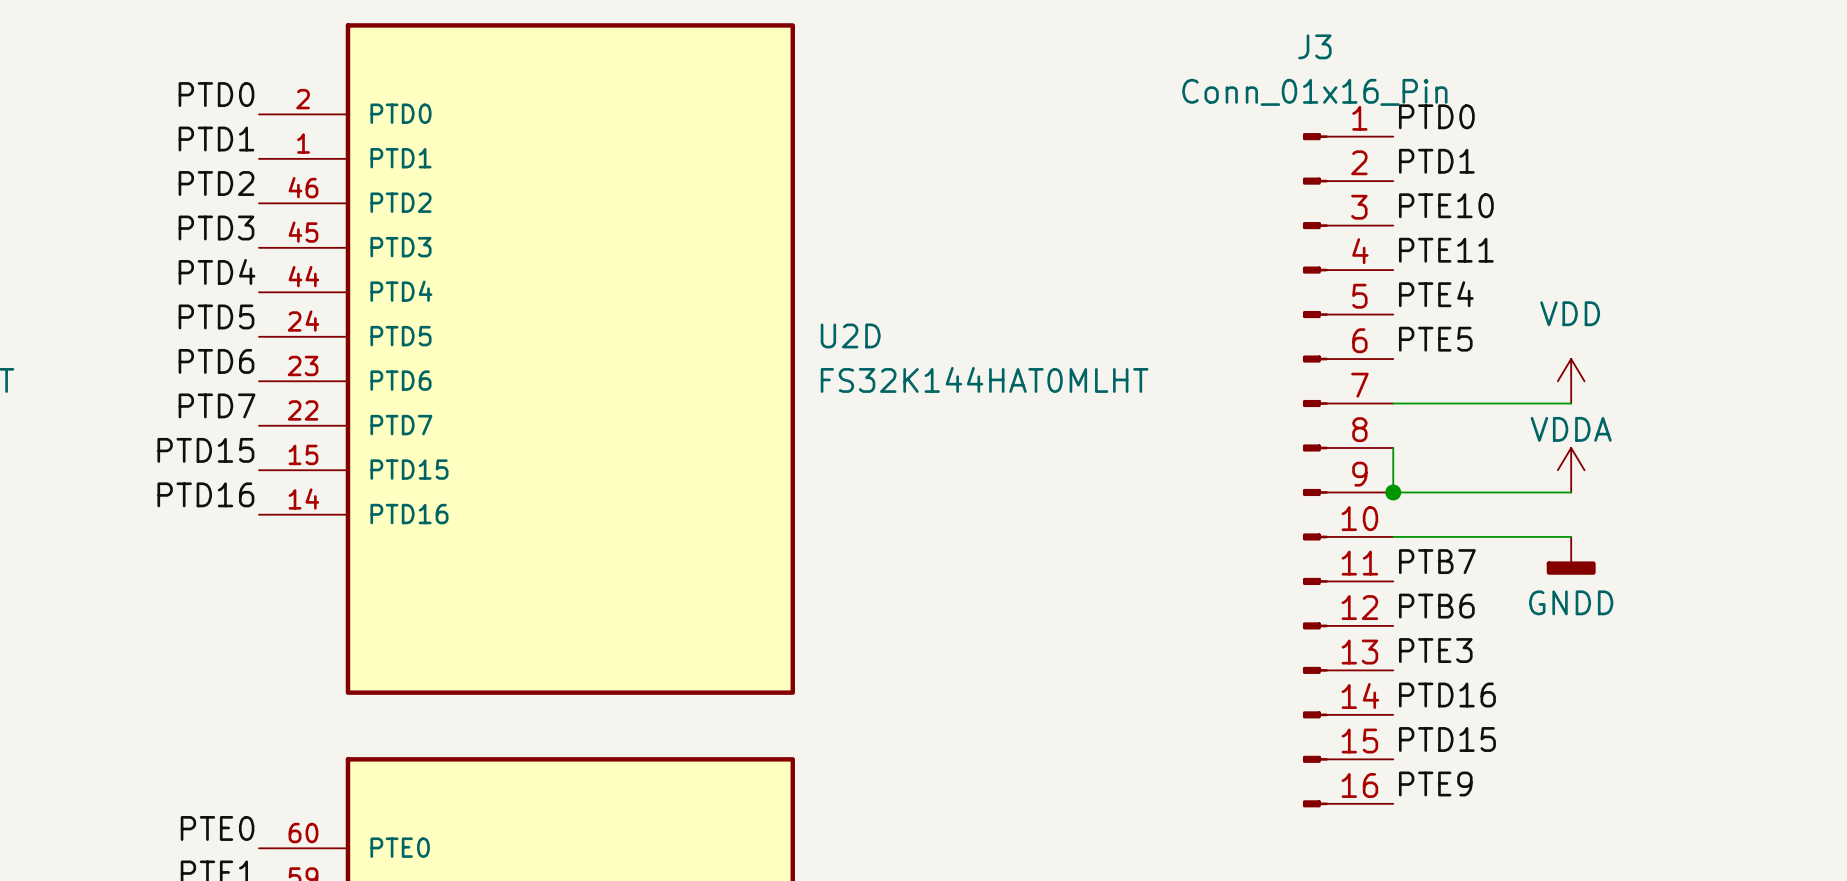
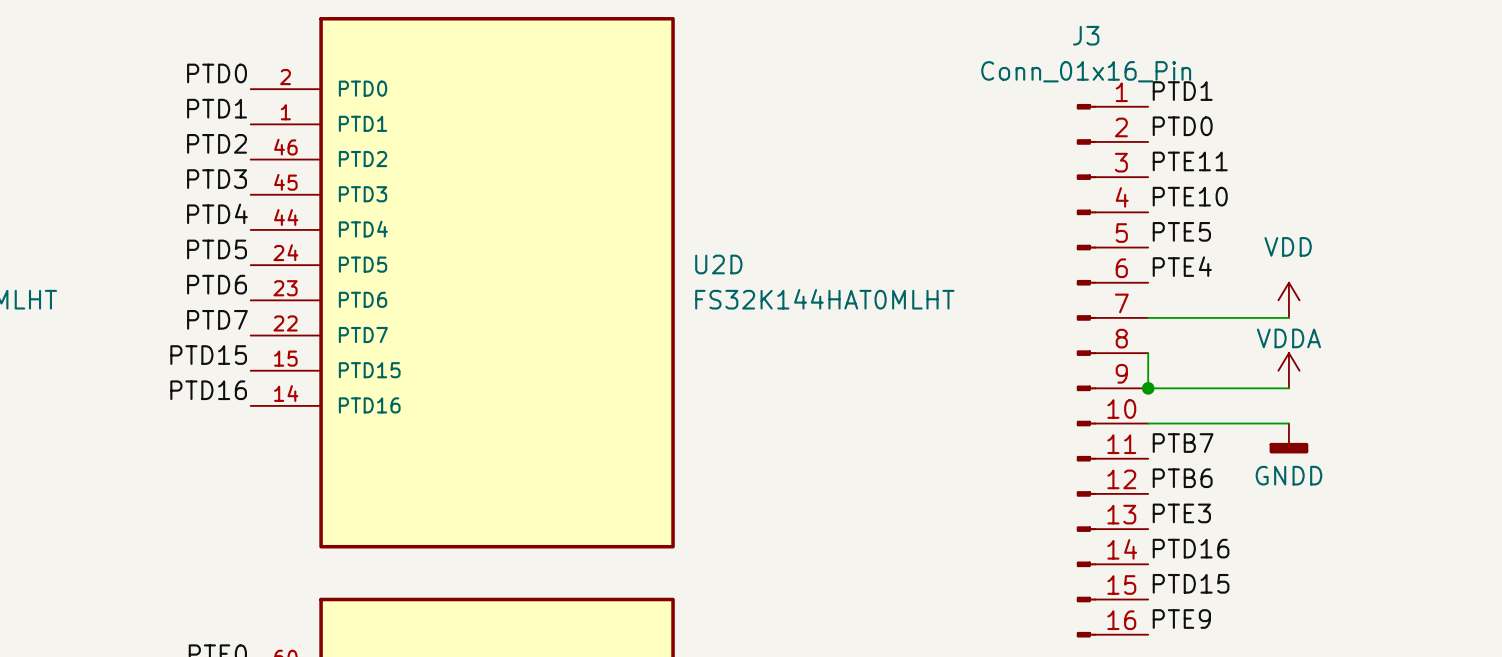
label: PTD0 (1436, 116) -> PTD1 (1182, 91)
label: PTD1 (1436, 161) -> PTD0 (1182, 126)
label: PTE10 (1446, 205) -> PTE11 (1190, 161)
label: PTE11 (1446, 250) -> PTE10 (1190, 196)
label: PTE4 (1436, 294) -> PTE5 (1181, 231)
label: PTE5 (1435, 339) -> PTE4 (1182, 266)

